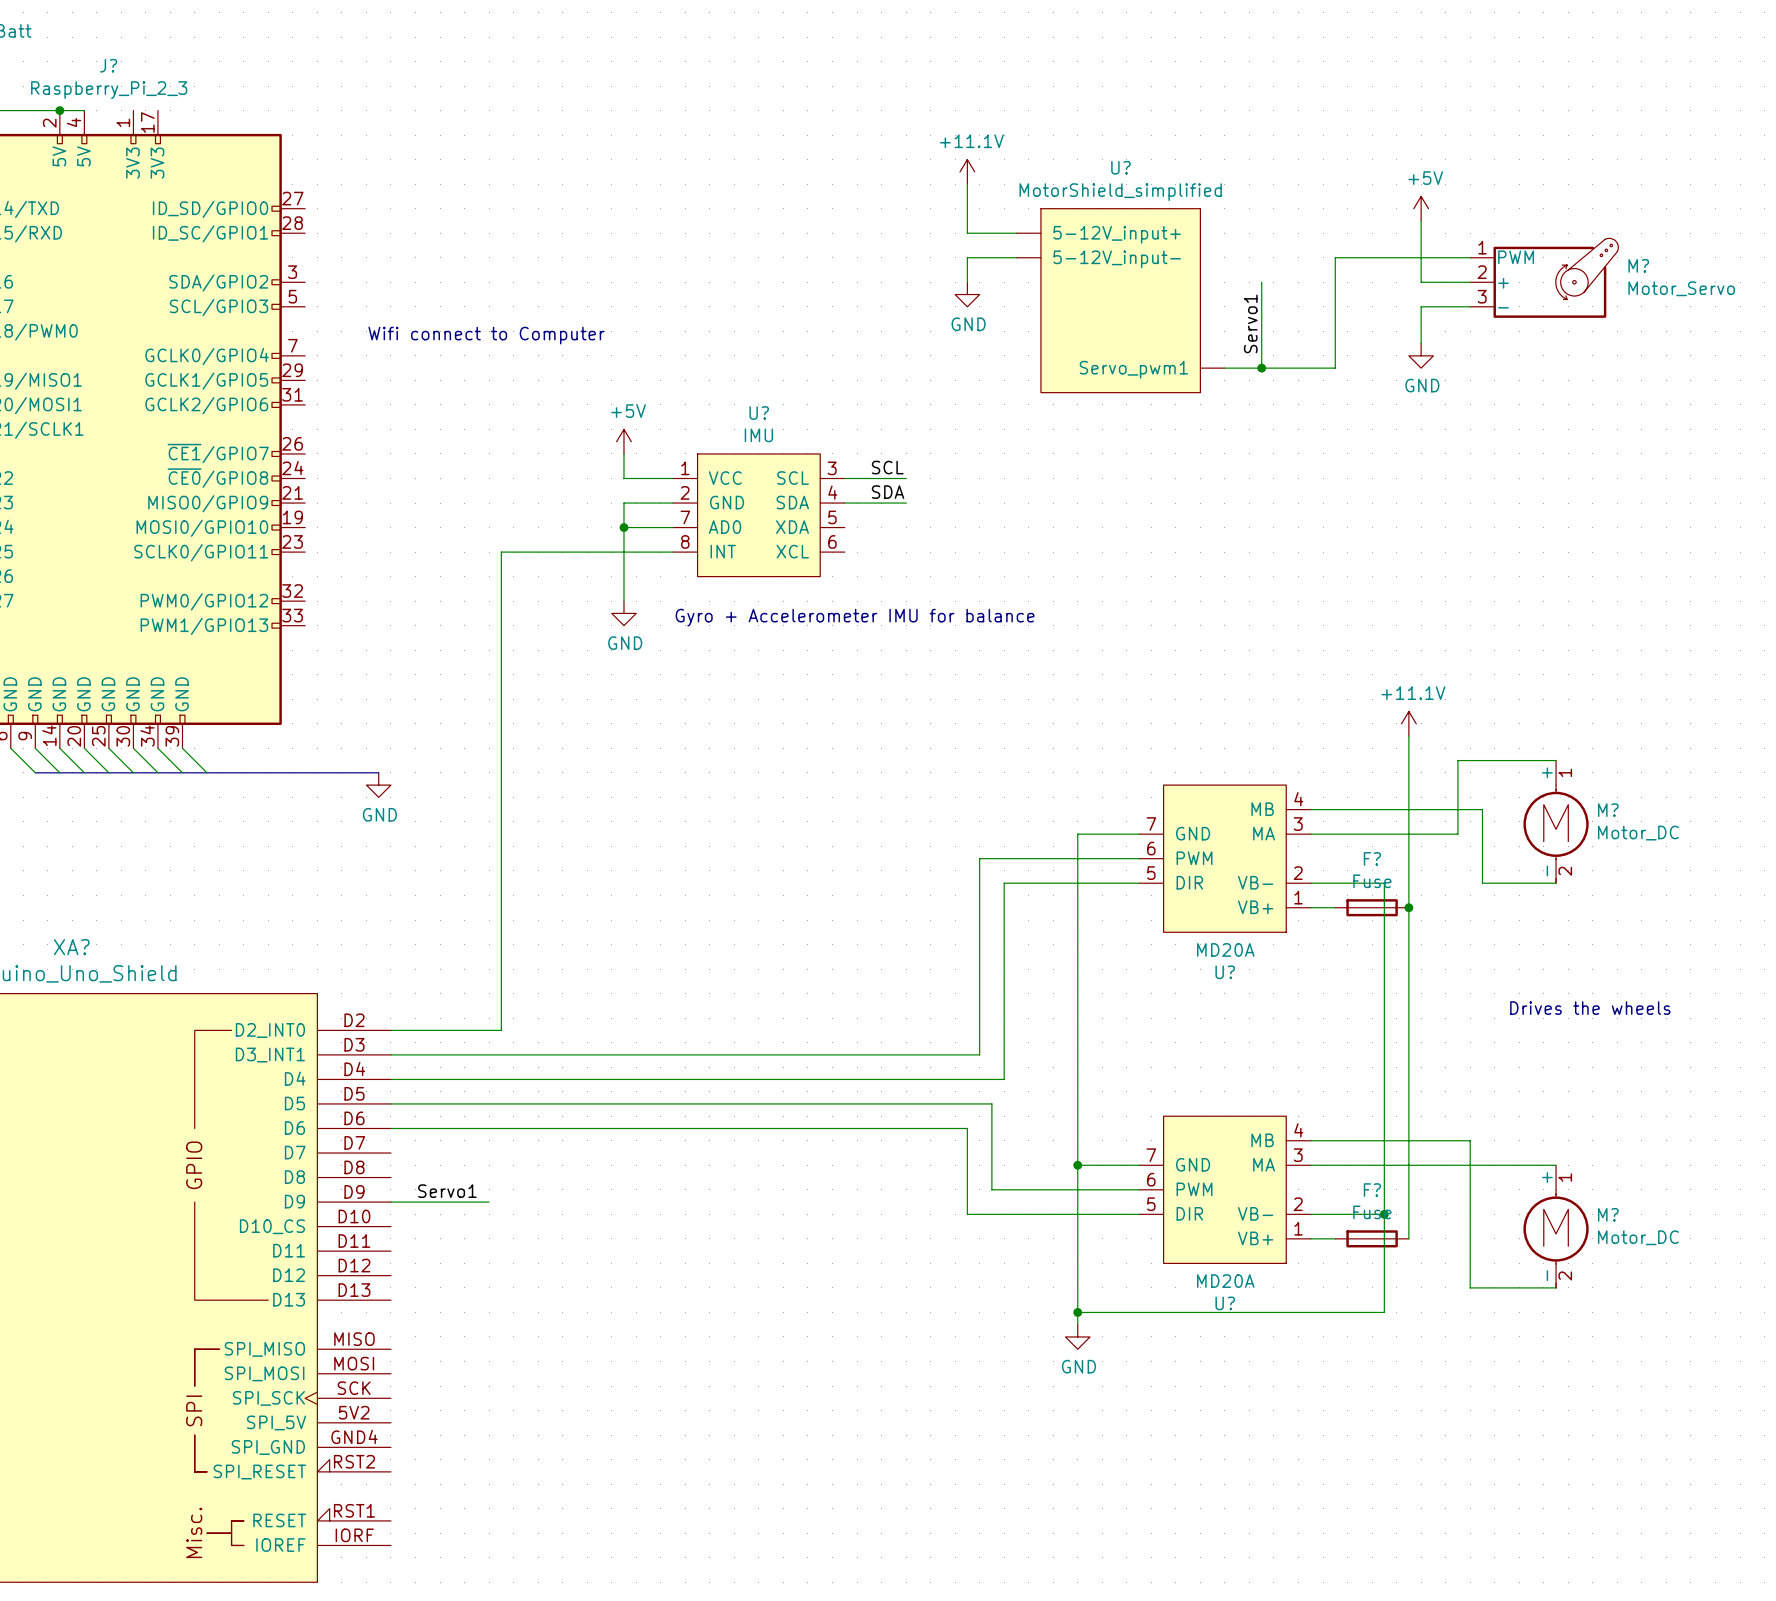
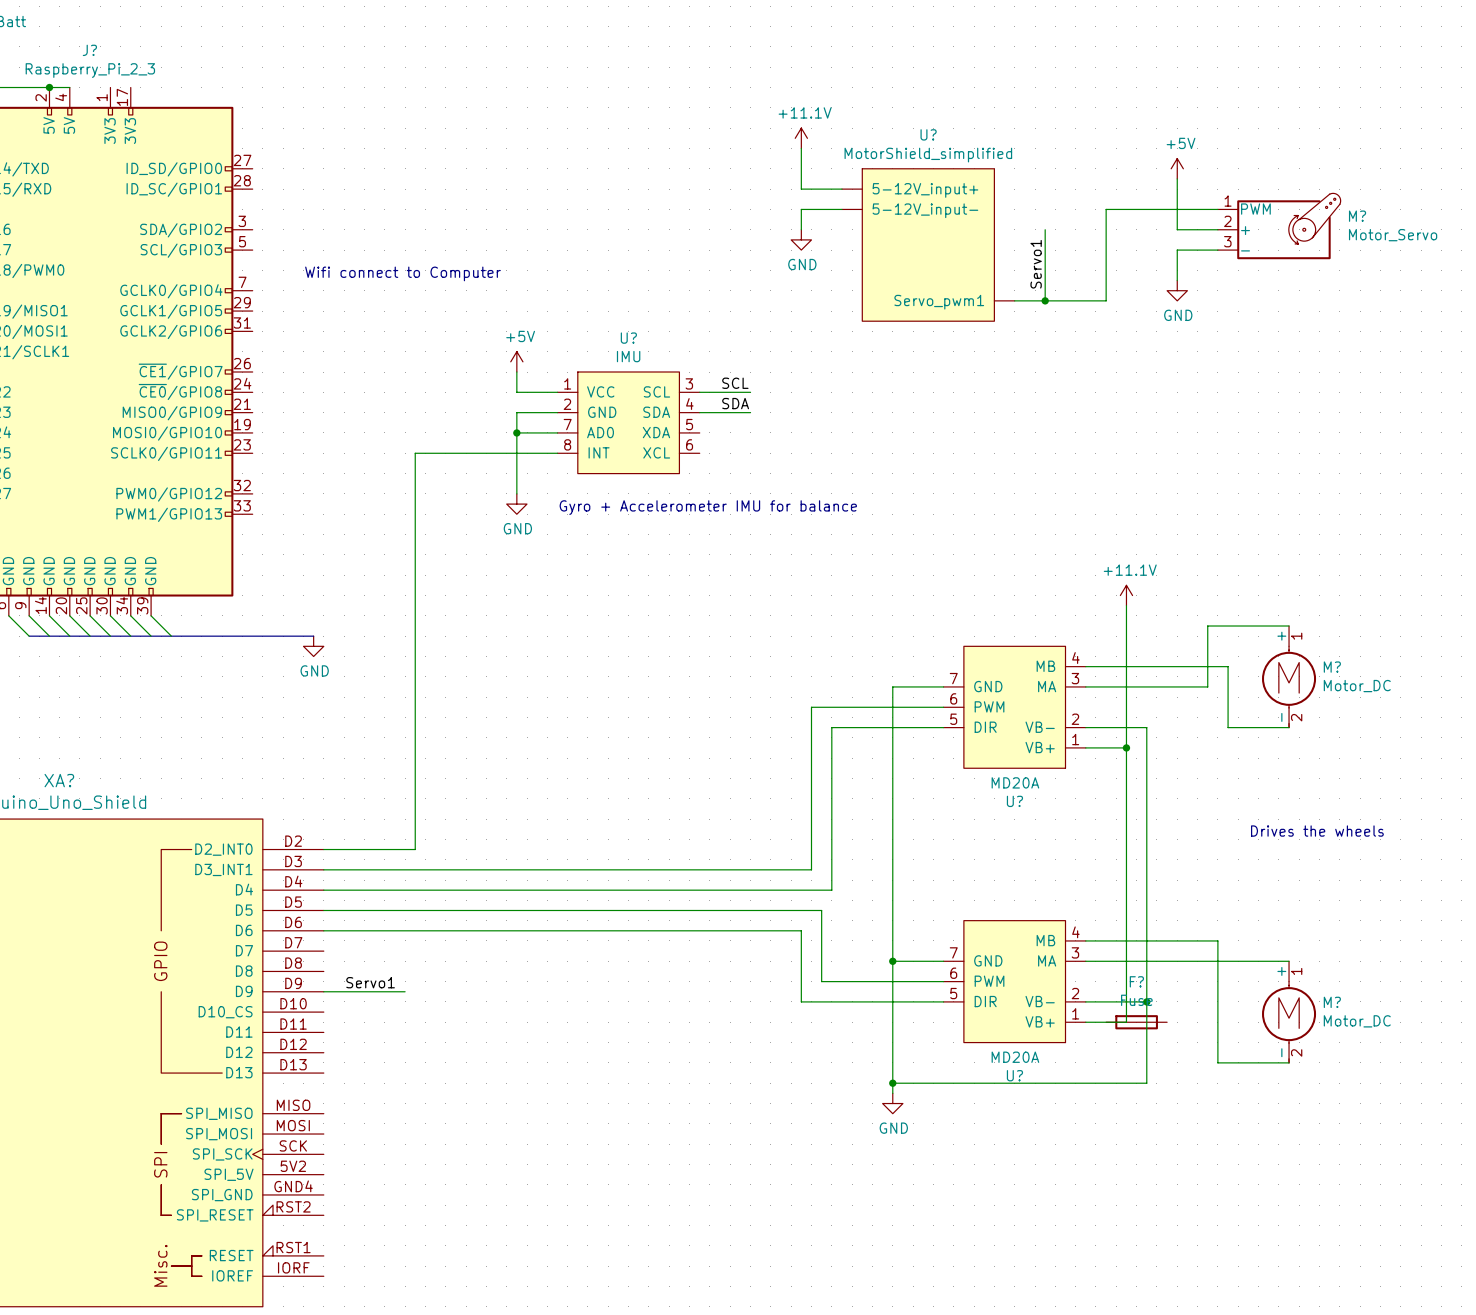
power symbol position: +11.1V (1408, 723) -> +11.1V (1126, 595)
wire: none -> (1126, 605) (1126, 1022) (1106, 1022)
wire: (1408, 736) (1408, 1238) -> none
F?: Fuse (1372, 907) -> none
junction position: (1408, 907) -> (1126, 747)

